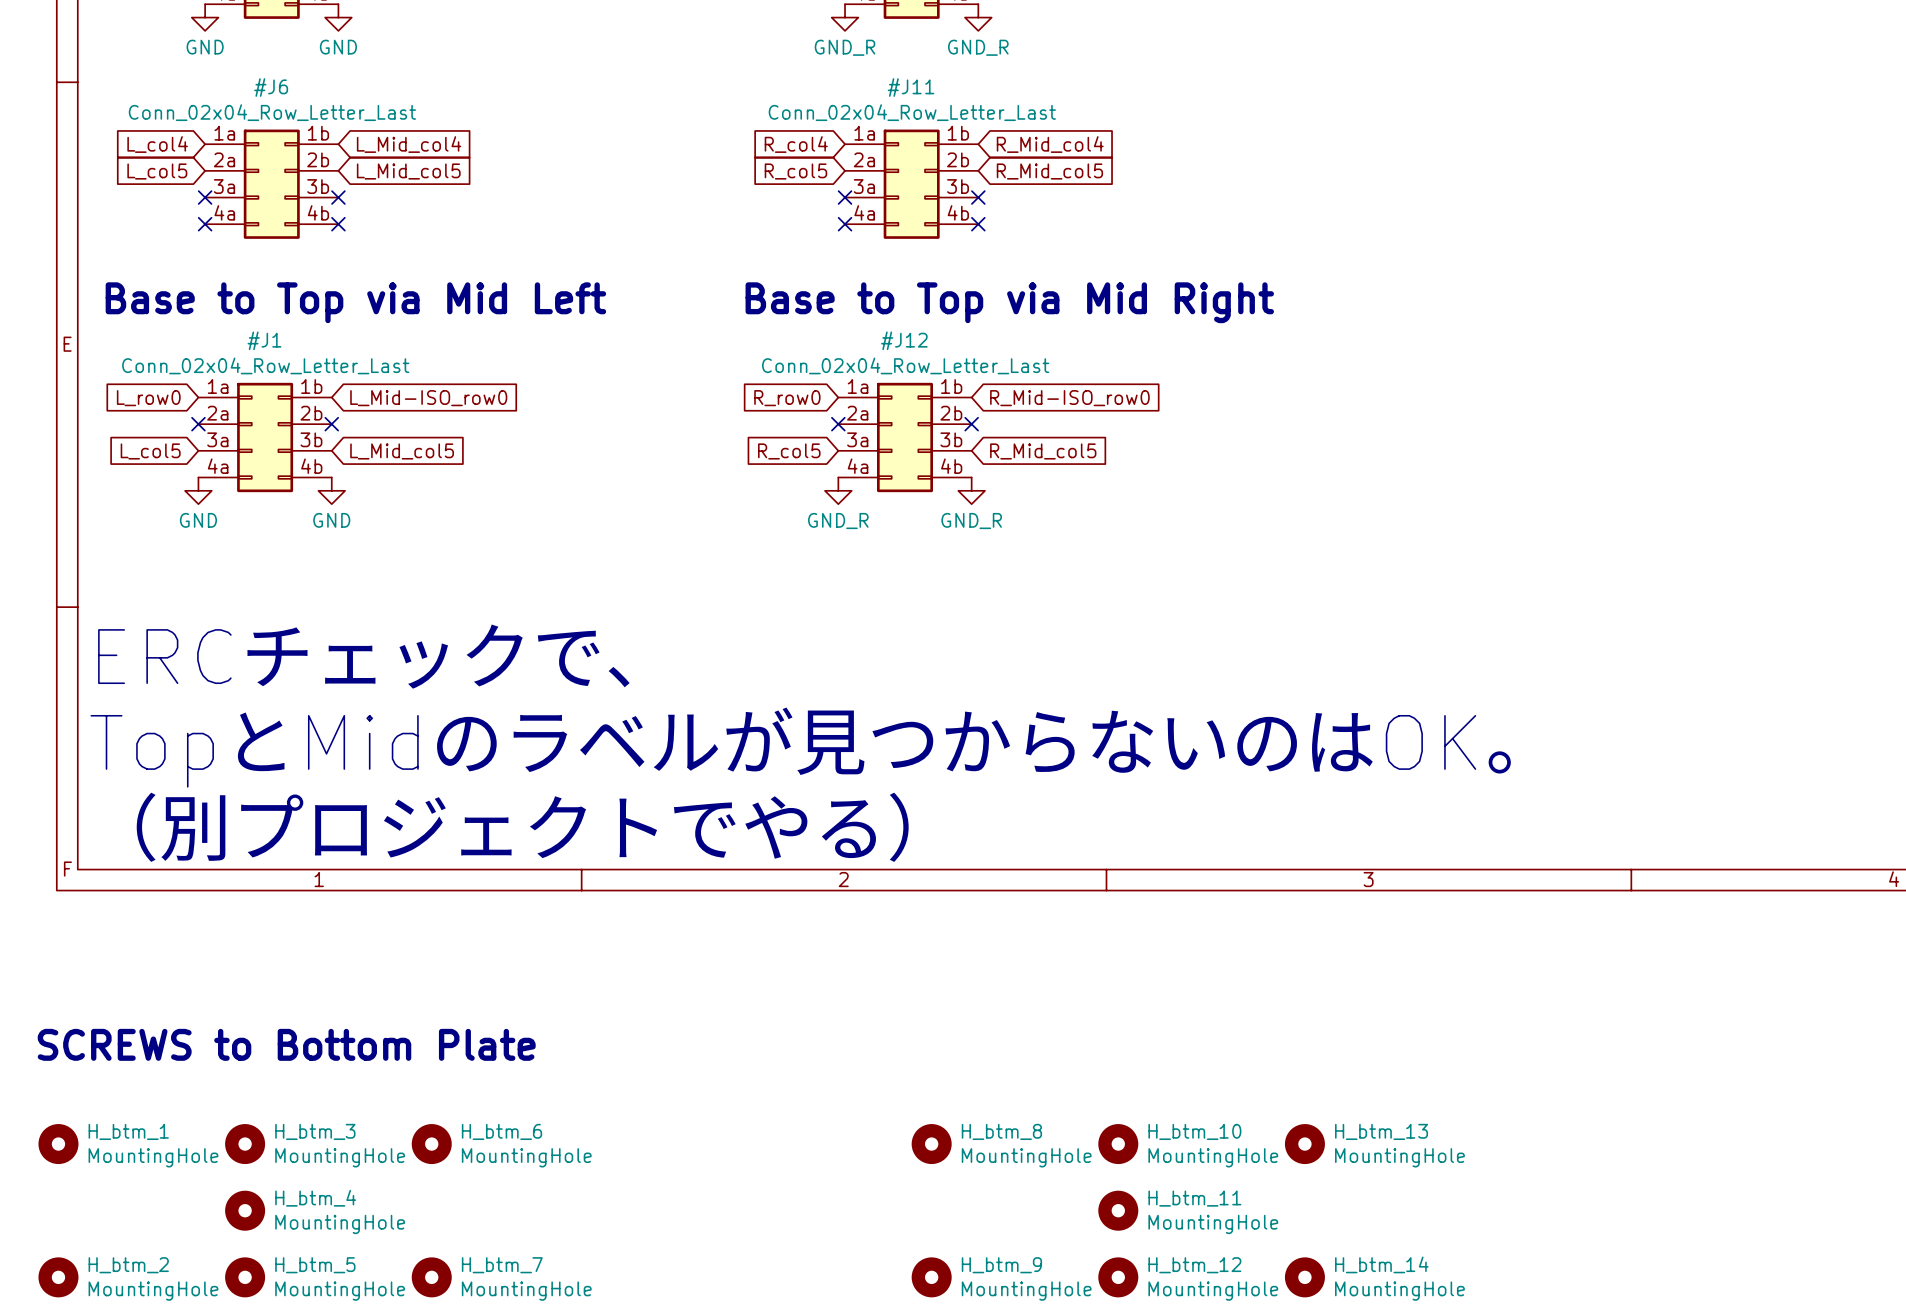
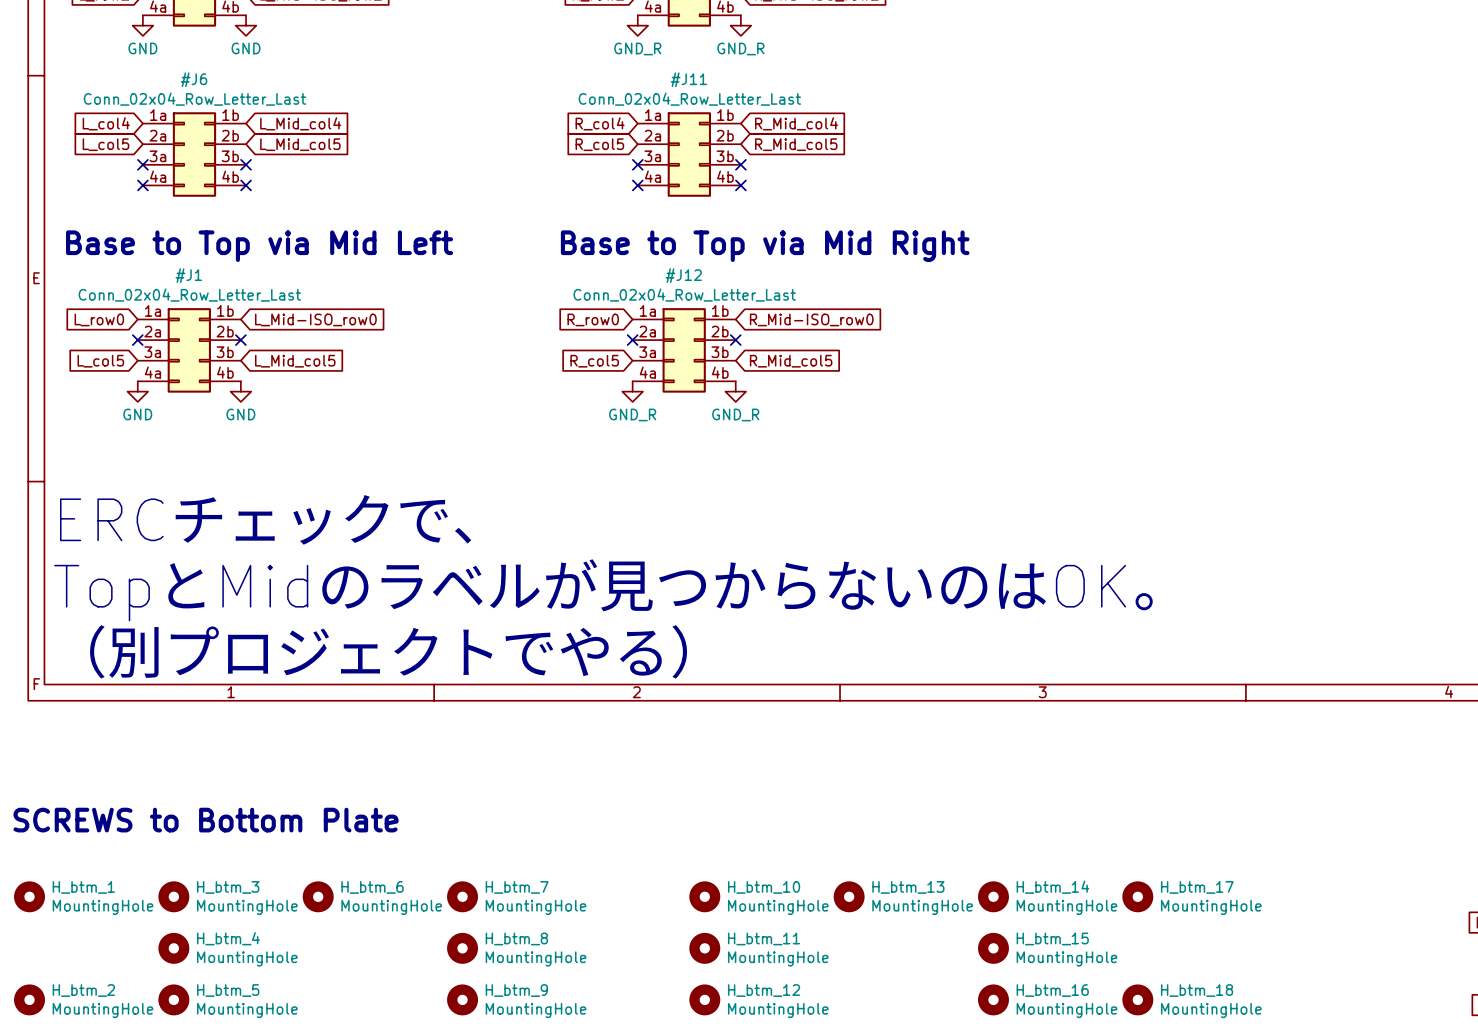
H_btm_8 name: H_btm_8 (1001, 1131) -> H_btm_10 (764, 887)
H_btm_10 name: H_btm_10 (1194, 1131) -> H_btm_13 (908, 887)
H_btm_13 name: H_btm_13 (1381, 1131) -> H_btm_14 (1052, 887)
H_btm_17: none -> MountingHole (1137, 896)
H_btm_8: none -> MountingHole (462, 948)
H_btm_11 position: (1118, 1210) -> (704, 948)
H_btm_15: none -> MountingHole (993, 948)
H_btm_14 name: H_btm_14 (1381, 1264) -> H_btm_16 (1052, 990)
H_btm_9 name: H_btm_9 (1001, 1265) -> H_btm_12 (764, 990)
H_btm_7 position: (431, 1277) -> (462, 896)
H_btm_9: none -> MountingHole (462, 999)
H_btm_12: MountingHole (1118, 1277) -> none
H_btm_18: none -> MountingHole (1137, 999)

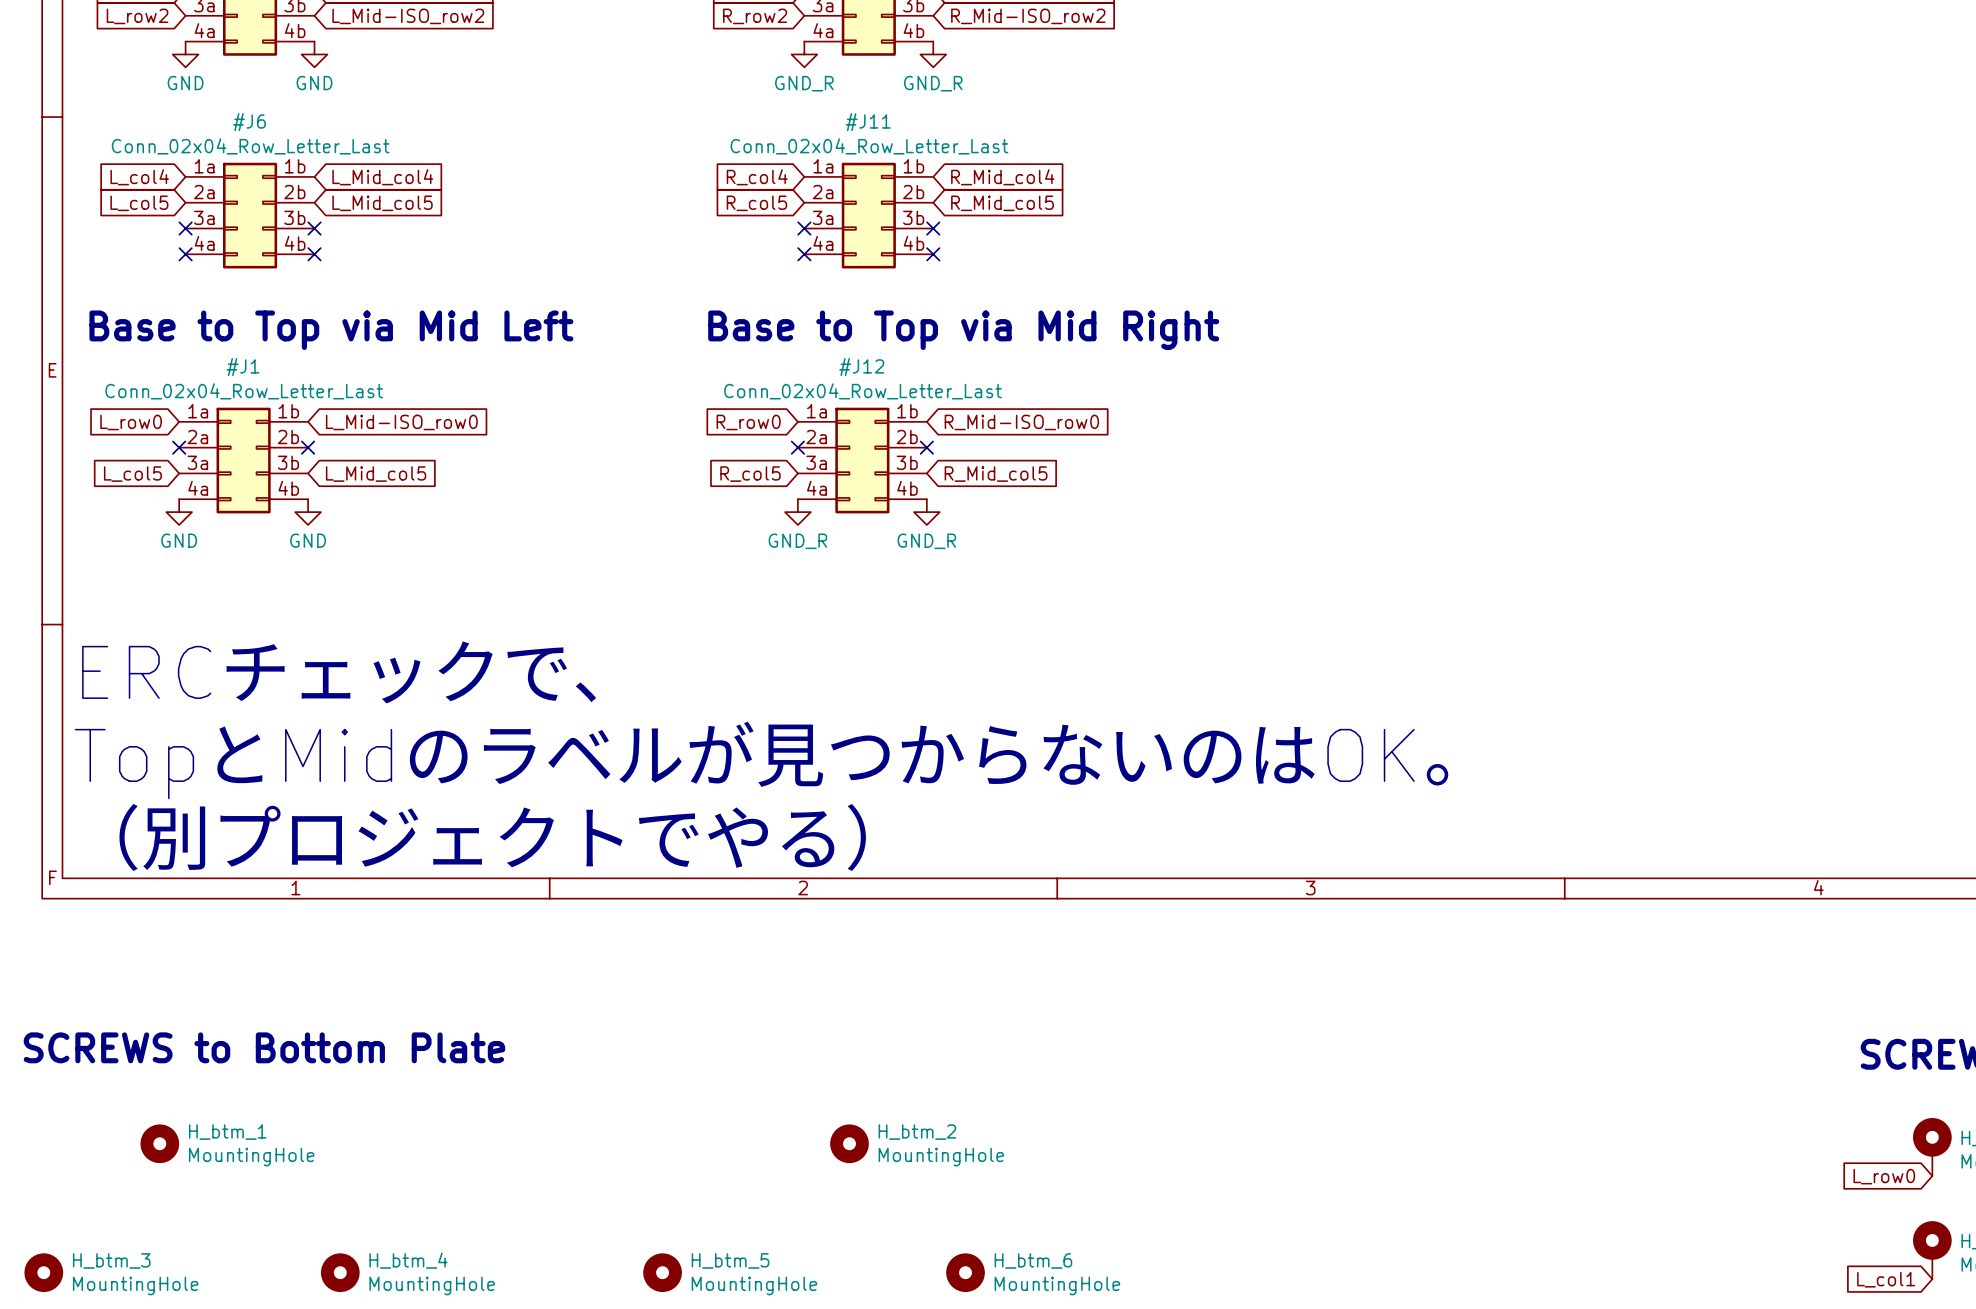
H_btm_1 position: (29, 896) -> (159, 1143)
H_btm_3: MountingHole (173, 896) -> none
H_btm_6 position: (318, 896) -> (965, 1272)
H_btm_7: MountingHole (462, 896) -> none
H_btm_2: none -> MountingHole (849, 1143)
H_btm_10: MountingHole (704, 896) -> none
H_btm_13: MountingHole (849, 896) -> none
H_btm_14: MountingHole (993, 896) -> none
H_btm_17: MountingHole (1137, 896) -> none
H_btm_4 position: (173, 948) -> (340, 1272)
H_btm_8: MountingHole (462, 948) -> none
H_btm_11: MountingHole (704, 948) -> none
H_btm_15: MountingHole (993, 948) -> none
H_btm_2 name: H_btm_2 (83, 990) -> H_btm_3 (111, 1260)
H_btm_5 position: (173, 999) -> (662, 1272)
H_btm_9: MountingHole (462, 999) -> none
H_btm_12: MountingHole (704, 999) -> none
H_btm_16: MountingHole (993, 999) -> none
H_btm_18: MountingHole (1137, 999) -> none

